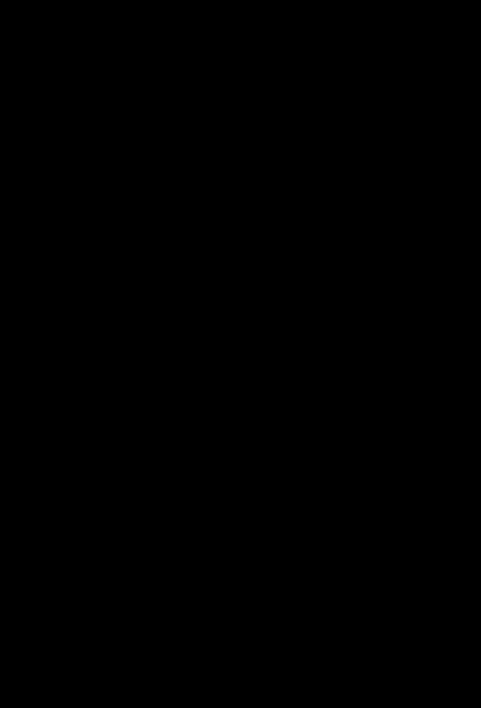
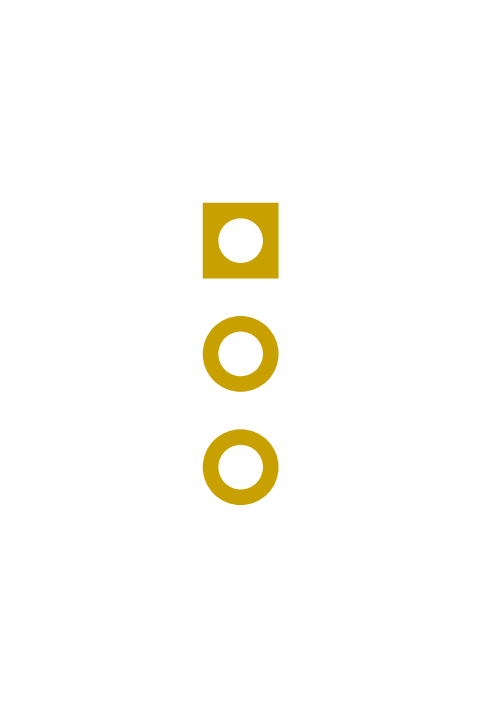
part: none -> (240, 353)

